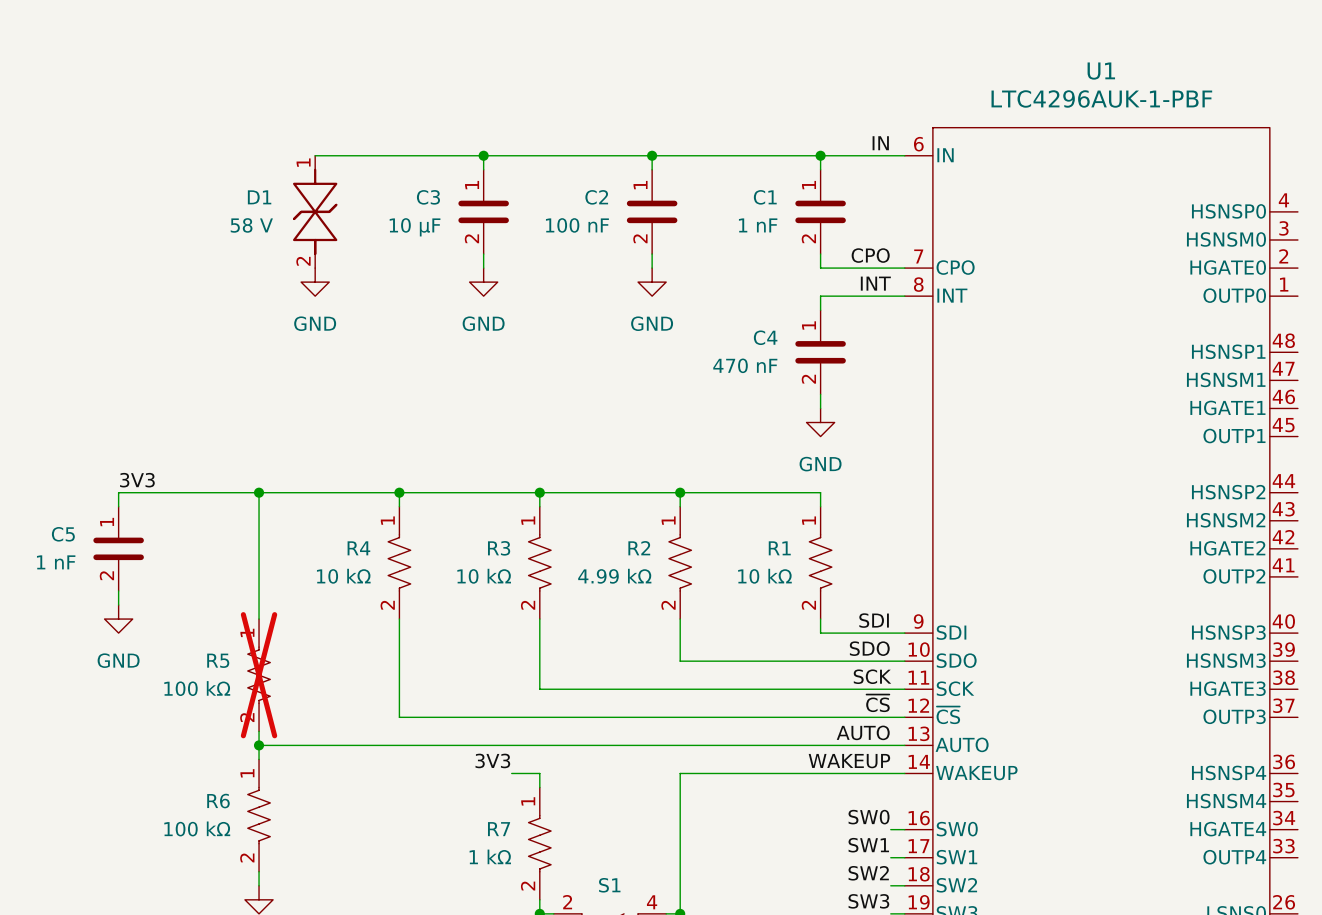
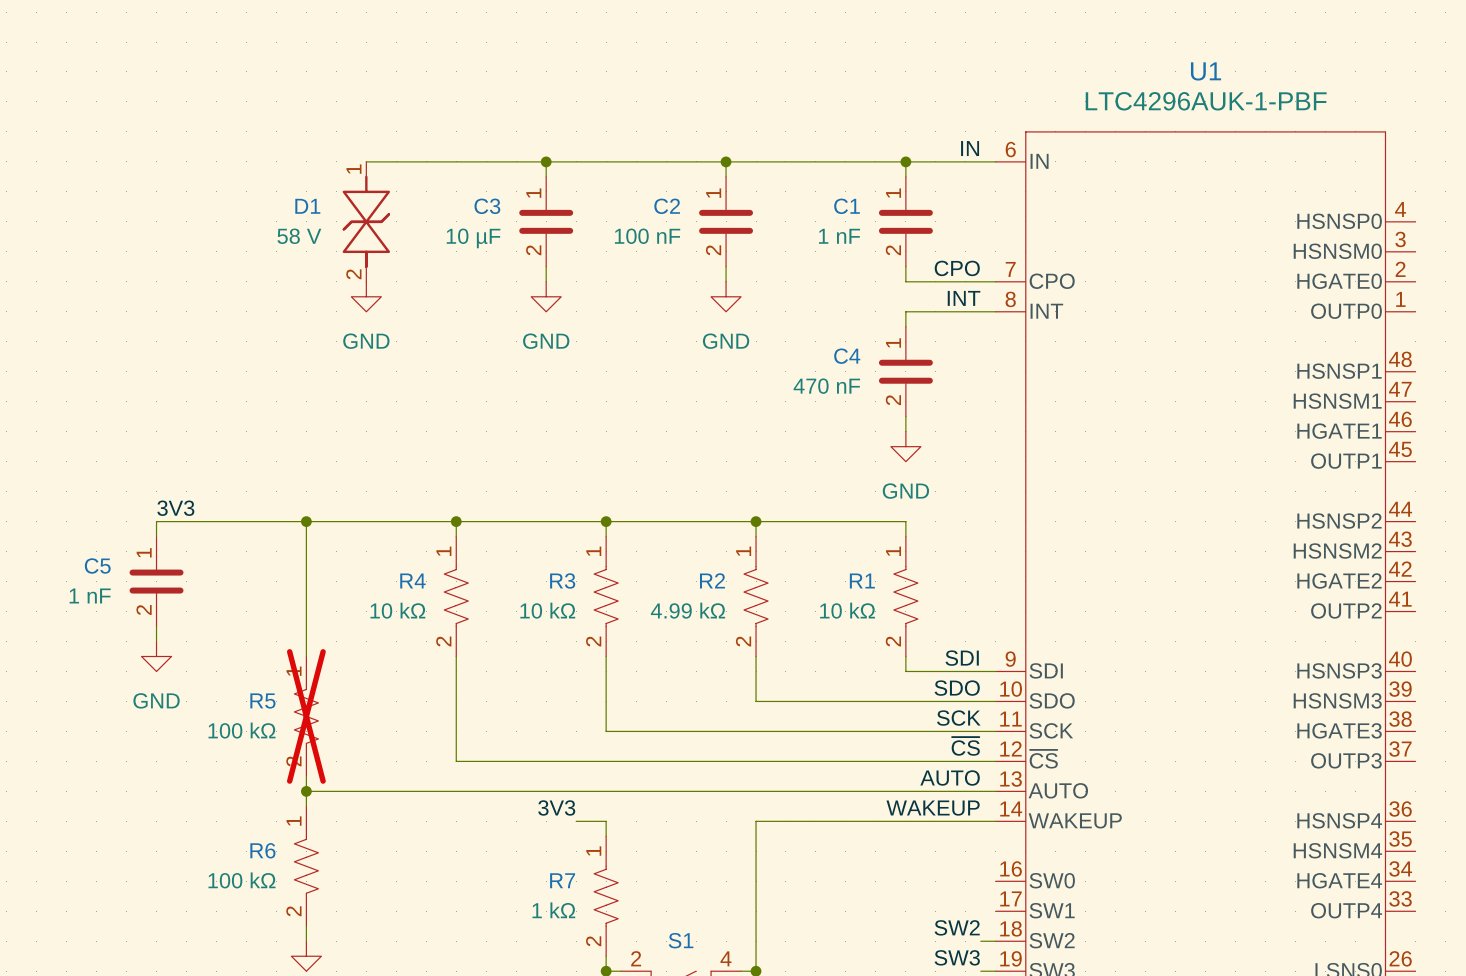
label: SW0 (869, 817) -> none
wire: (890, 829) (904, 829) -> none
label: SW1 (868, 845) -> none
wire: (890, 857) (904, 857) -> none

